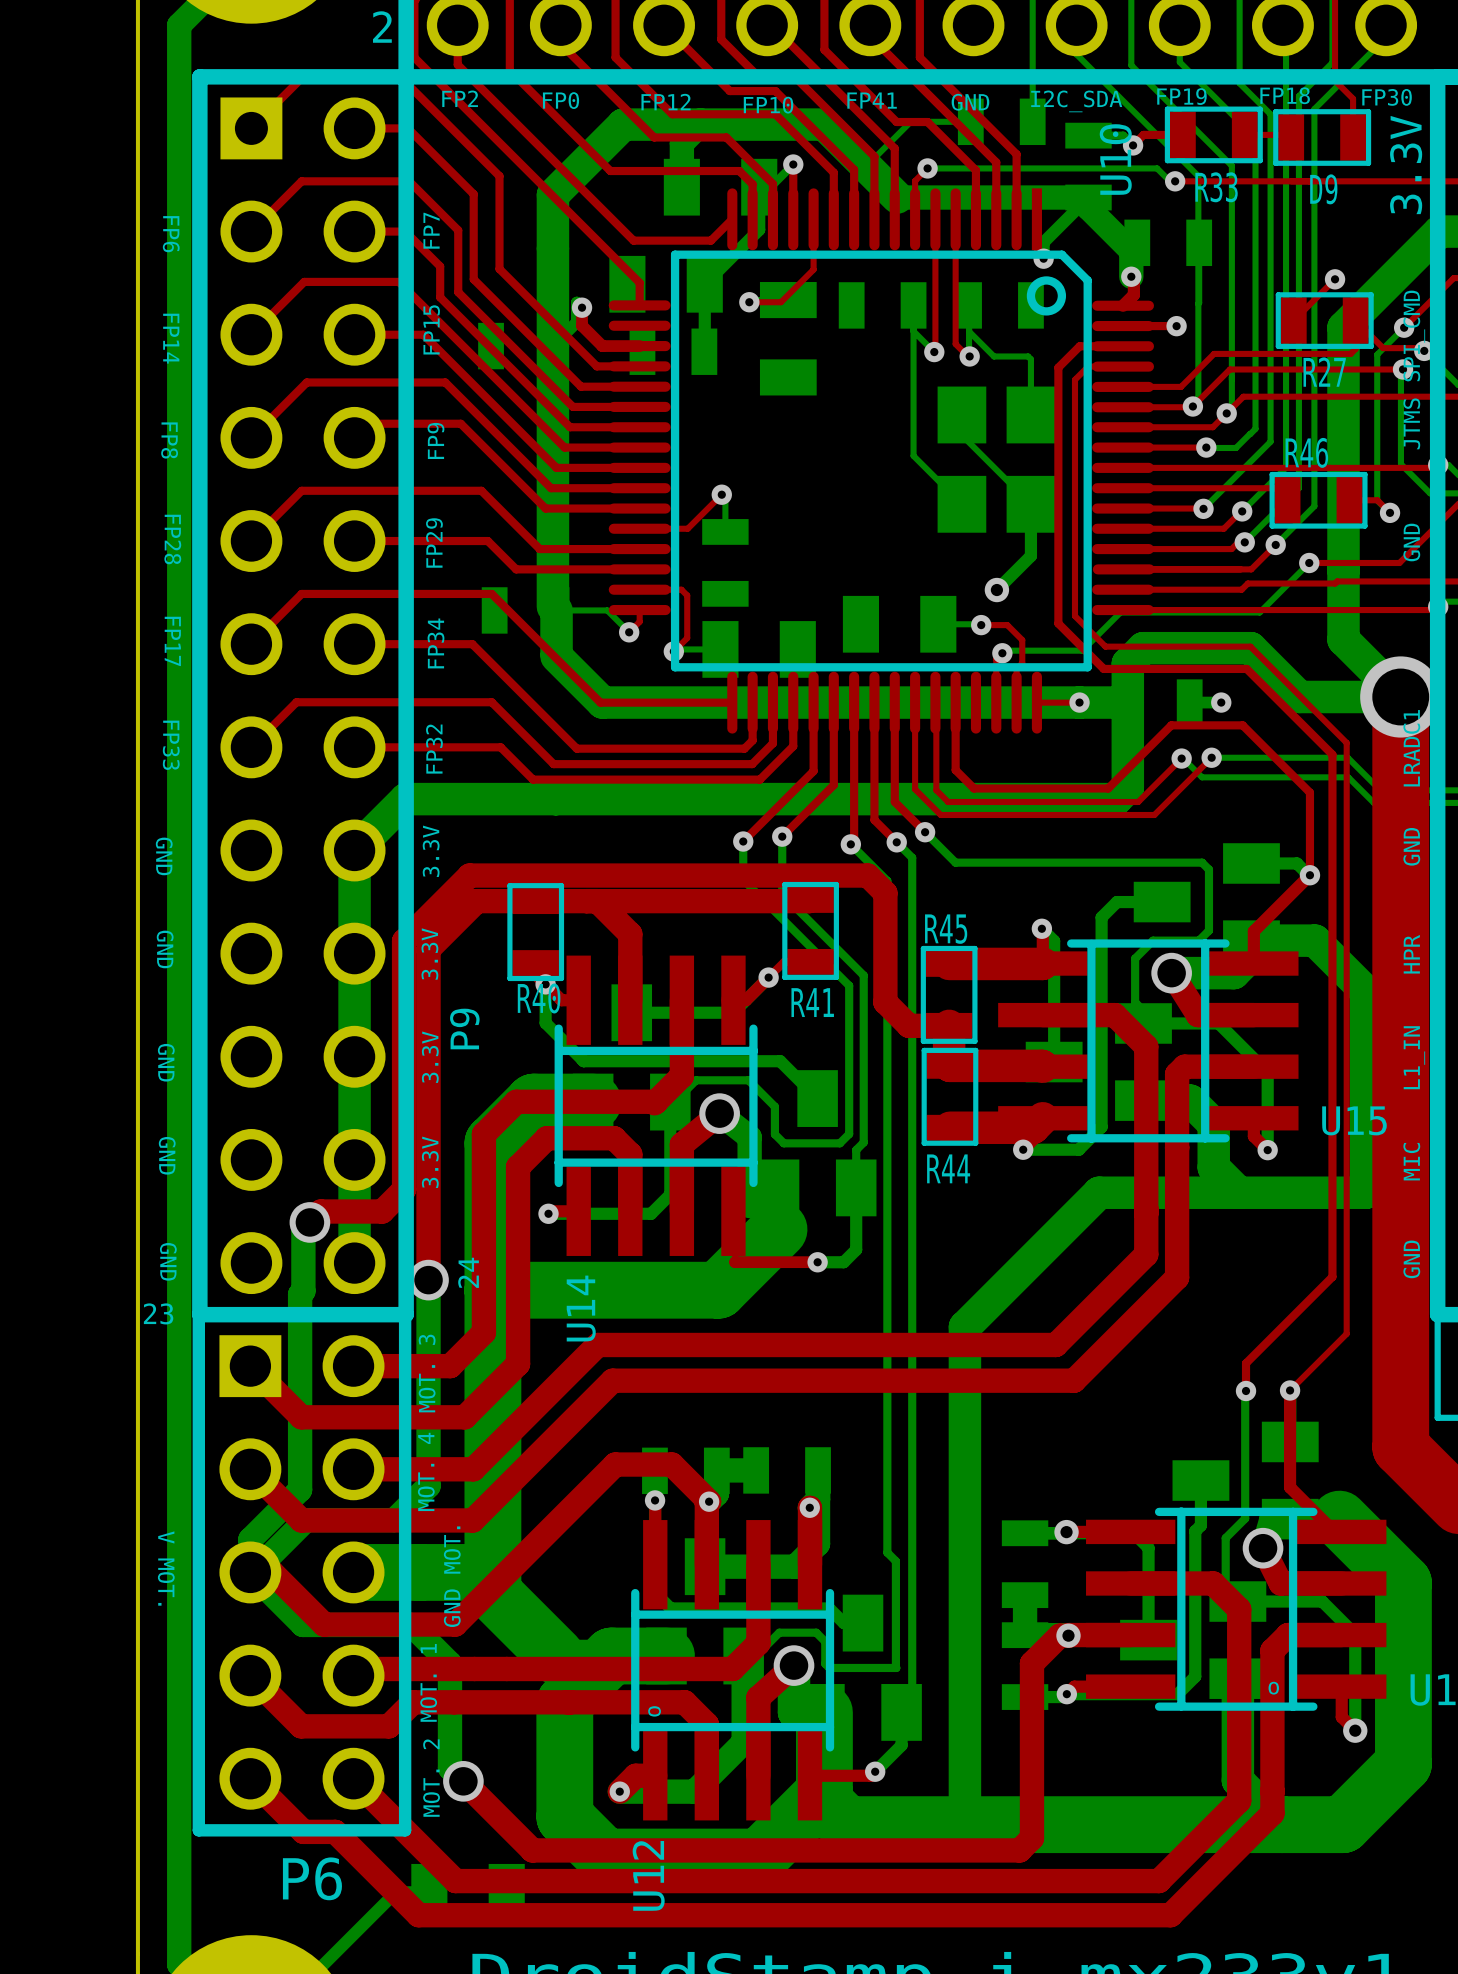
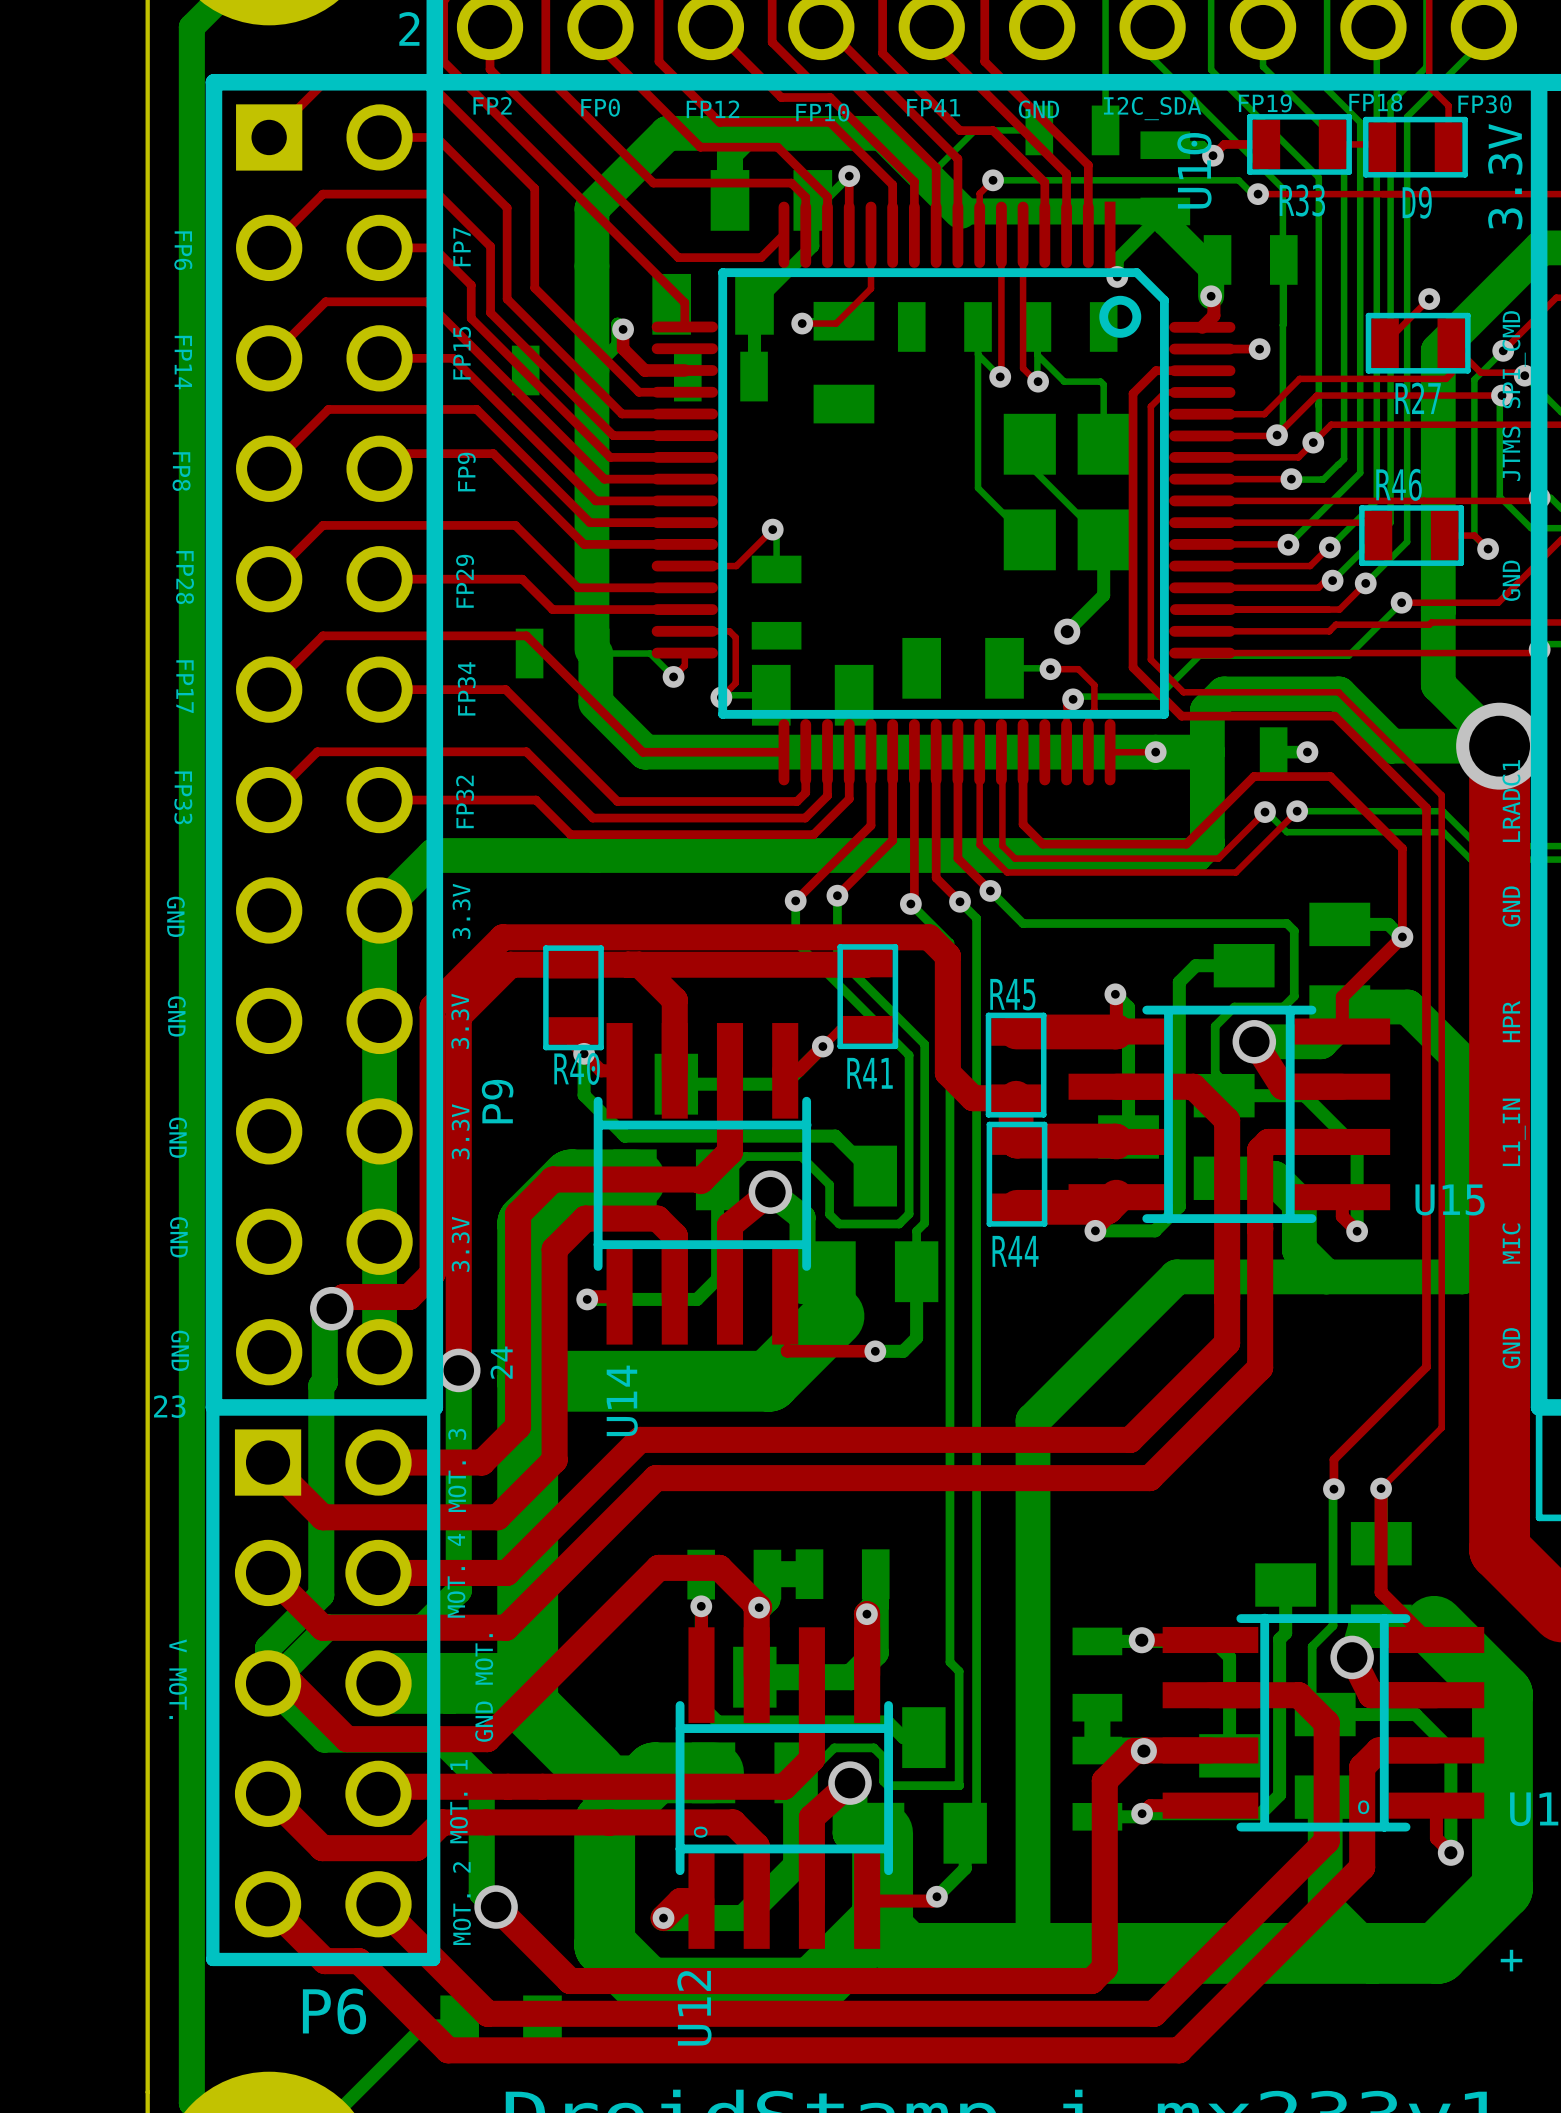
top track: (1239, 1719) (1239, 1800) (1158, 1881) (1077, 1881) -> (1326, 1841) (1154, 2013)
top track: (1272, 1744) (1272, 1813) (1170, 1915) (1101, 1915) -> (1362, 1867) (1179, 2050)
text: none -> + (1511, 1960)

